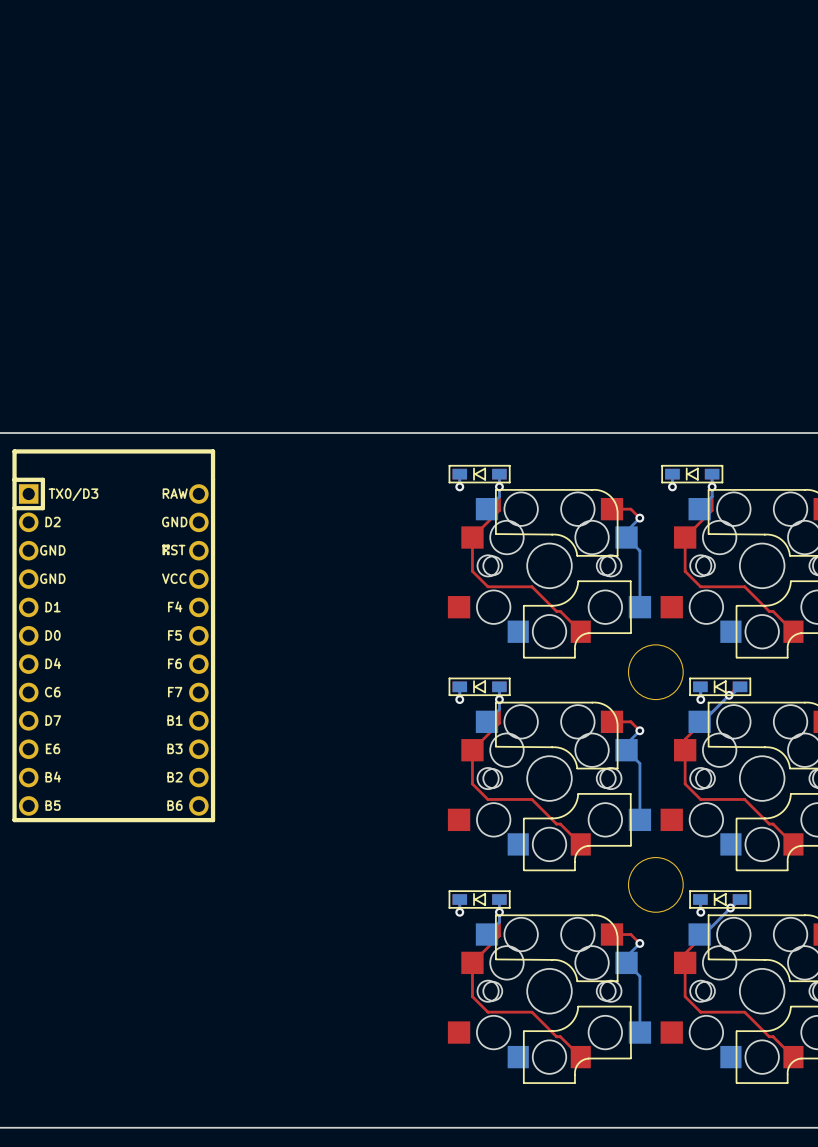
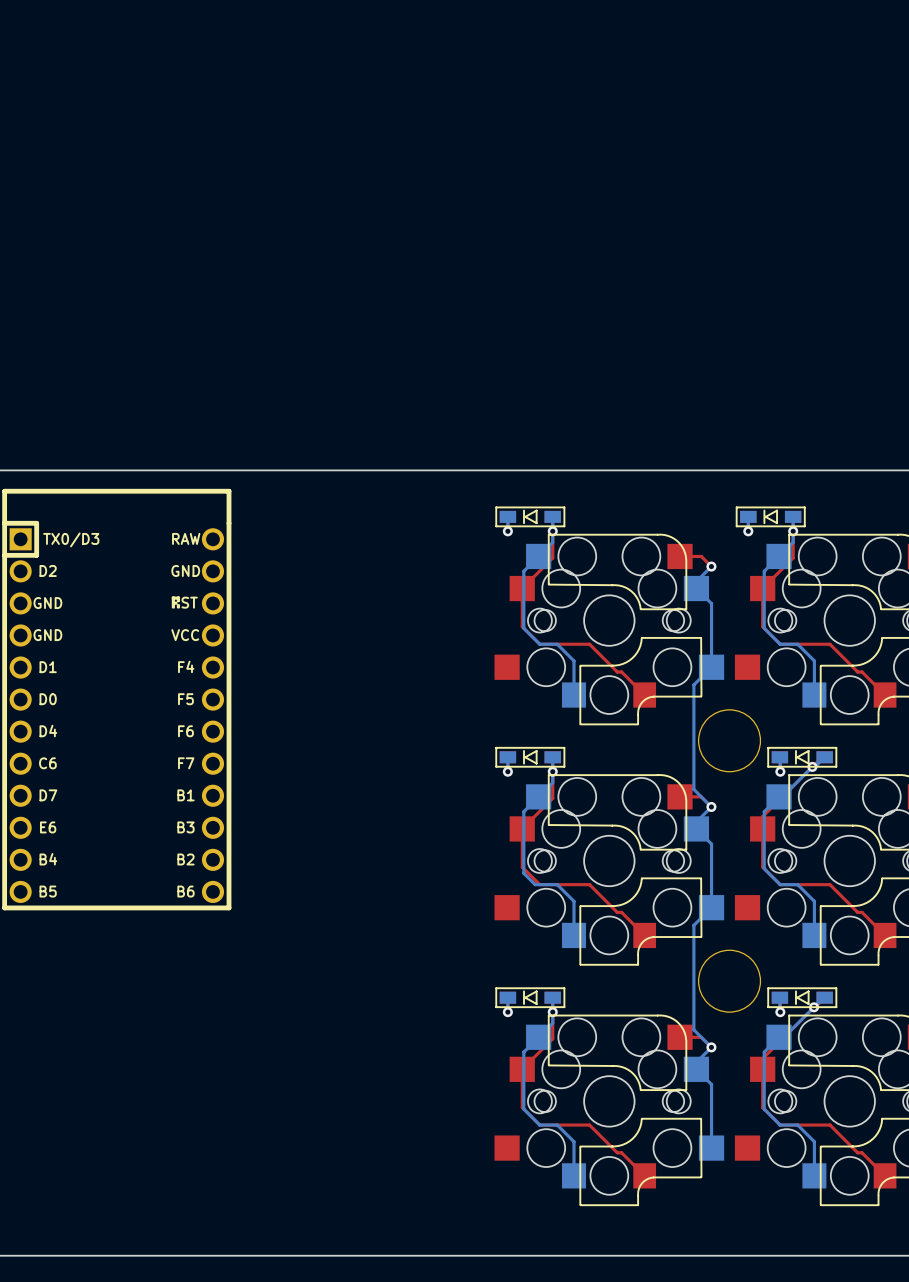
bottom track: none -> (538, 556) (523, 571) (523, 628) (539, 644) (557, 644) (574, 660) (574, 695)
bottom track: none -> (779, 556) (764, 571) (764, 628) (780, 644) (797, 644) (814, 660) (814, 695)
bottom track: none -> (711, 667) (693, 684) (693, 789) (711, 806)
bottom track: none -> (538, 796) (523, 811) (523, 873) (535, 884) (557, 884) (574, 901) (574, 935)
bottom track: none -> (779, 796) (764, 811) (764, 868) (780, 884) (797, 884) (814, 901) (814, 935)
bottom track: none -> (711, 907) (693, 925) (693, 1029) (711, 1047)
bottom track: none -> (538, 1037) (523, 1052) (523, 1109) (539, 1125) (557, 1125) (574, 1141) (574, 1175)
bottom track: none -> (779, 1037) (764, 1052) (764, 1109) (780, 1125) (797, 1125) (814, 1141) (814, 1175)

